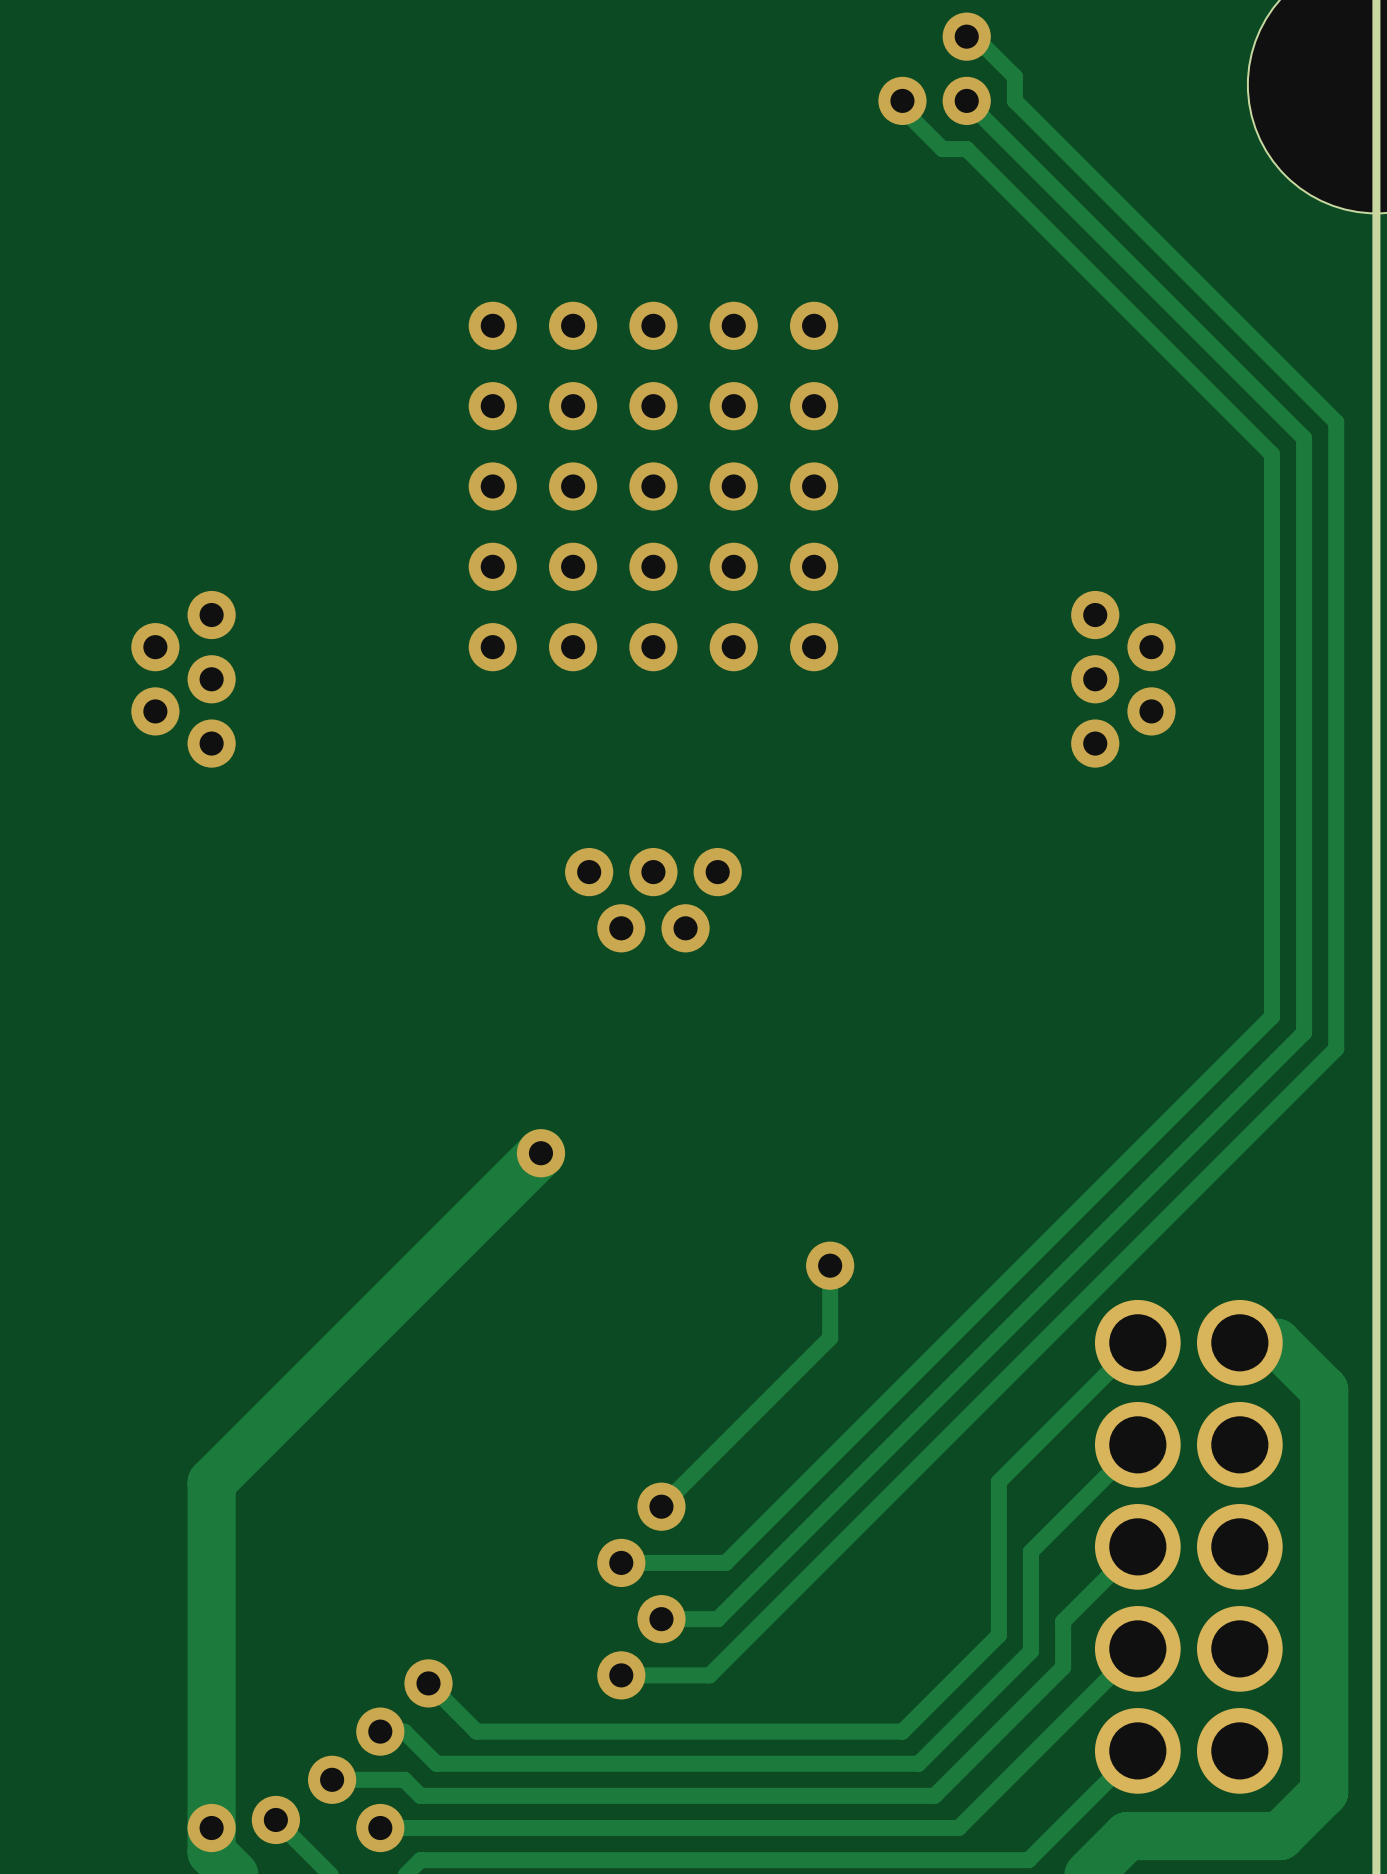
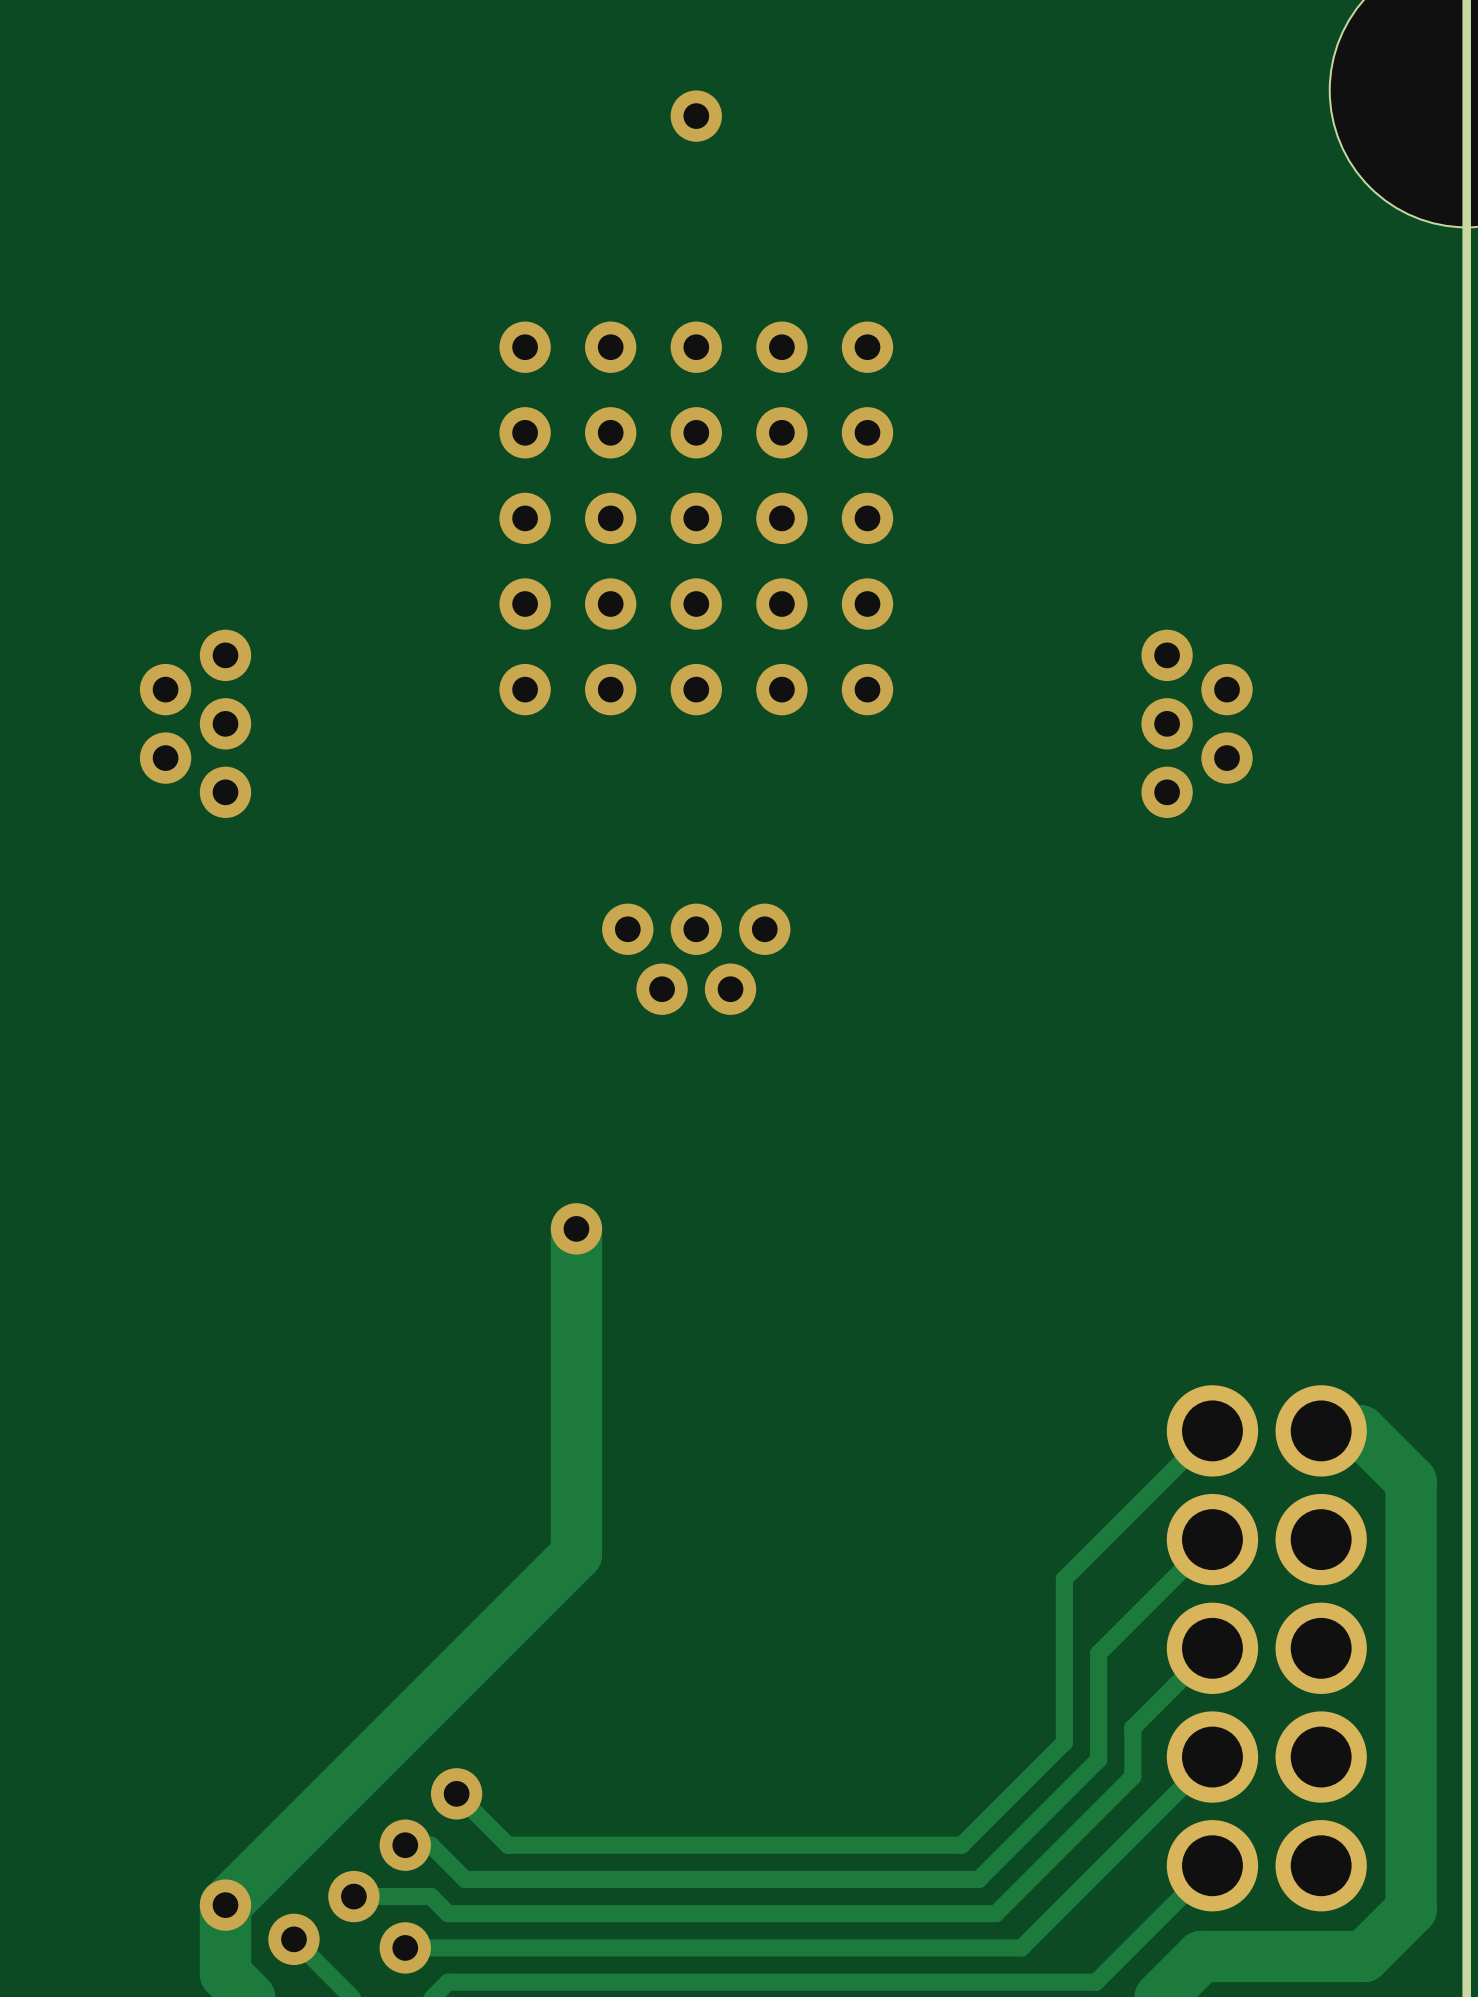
track: (966, 36) (974, 36) (1014, 76) (1014, 100) (1336, 422) (1336, 1048) (709, 1675) (621, 1675) -> none
via: (966, 36) -> none
track: (902, 100) (902, 108) (942, 149) (966, 149) (1271, 454) (1271, 1016) (725, 1562) (621, 1562) -> none
via: (902, 100) -> none
track: (966, 100) (1304, 438) (1304, 1032) (717, 1619) (661, 1619) -> none
via: (966, 100) -> none
via: none -> (696, 116)
track: (540, 1153) (211, 1482) (211, 1787) -> (576, 1228) (576, 1554) (225, 1905)
track: (830, 1265) (830, 1338) (661, 1506) -> none
via: (830, 1265) -> none
via: (661, 1506) -> none
via: (621, 1562) -> none
via: (661, 1619) -> none
via: (621, 1675) -> none
via position: (211, 1828) -> (225, 1905)

